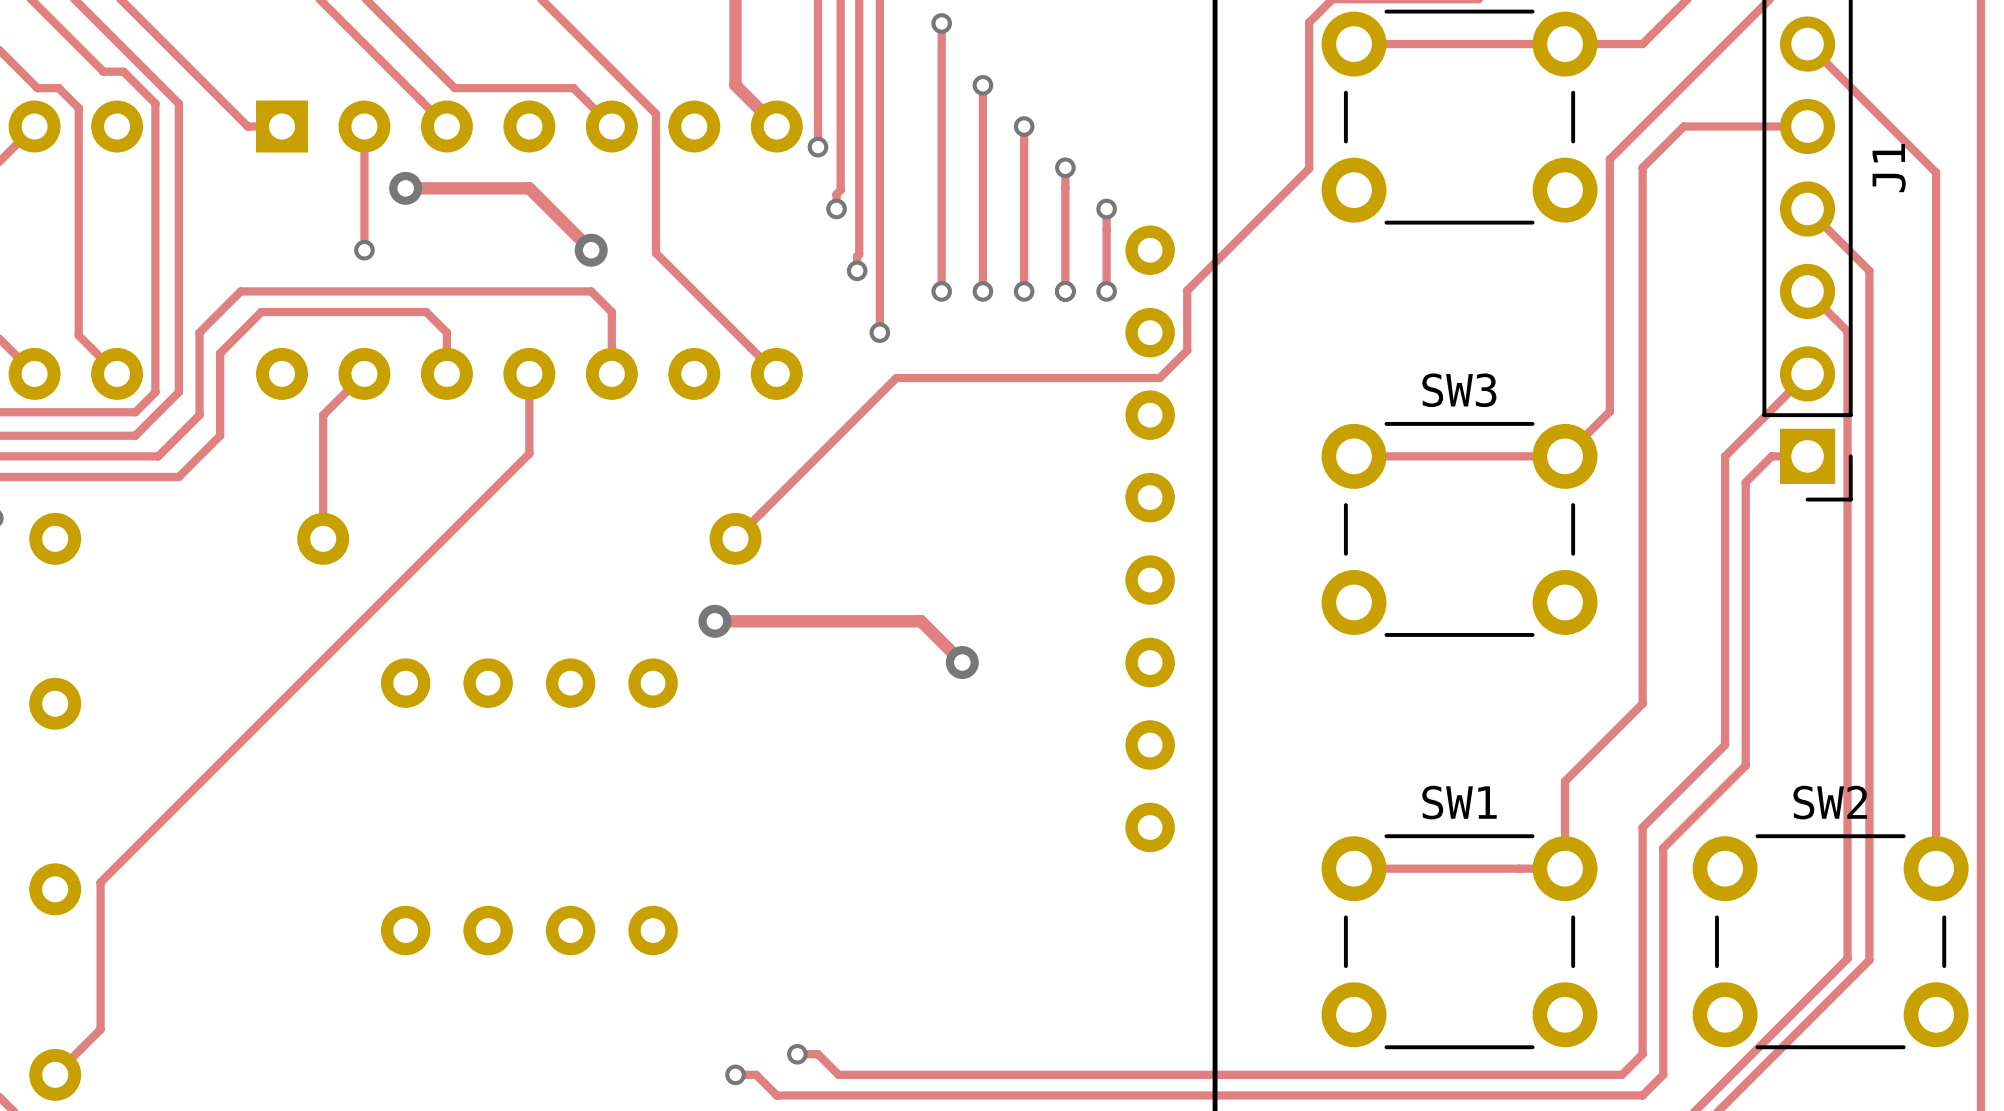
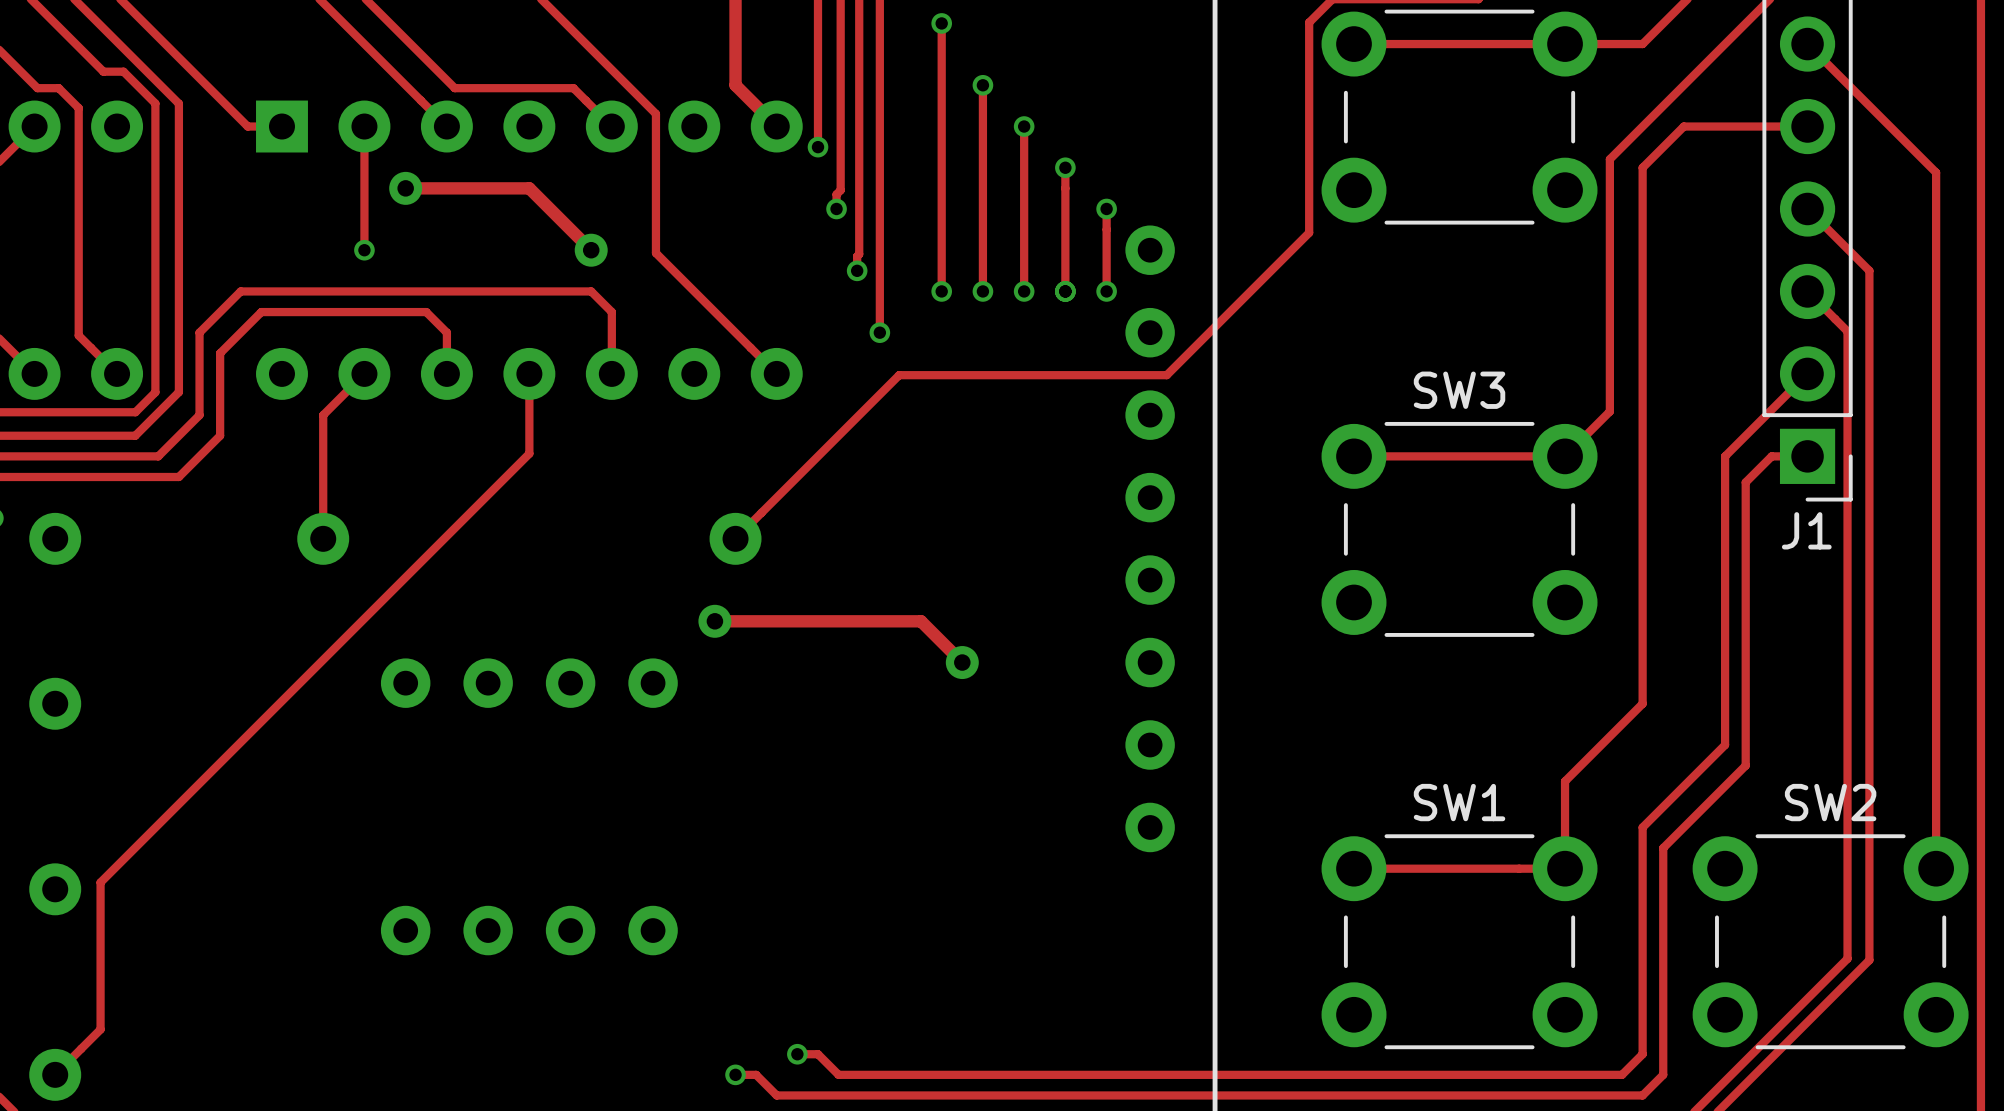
track: (1309, 168) (1187, 290) (1187, 350) (1159, 378) (896, 378) -> (1309, 168) (1309, 232) (1166, 375) (899, 375) (896, 378)
J1 name rotation: 0° (1889, 168) -> 90° clockwise (1806, 530)
J1 name position: J1 (1889, 168) -> J1 (1806, 530)

